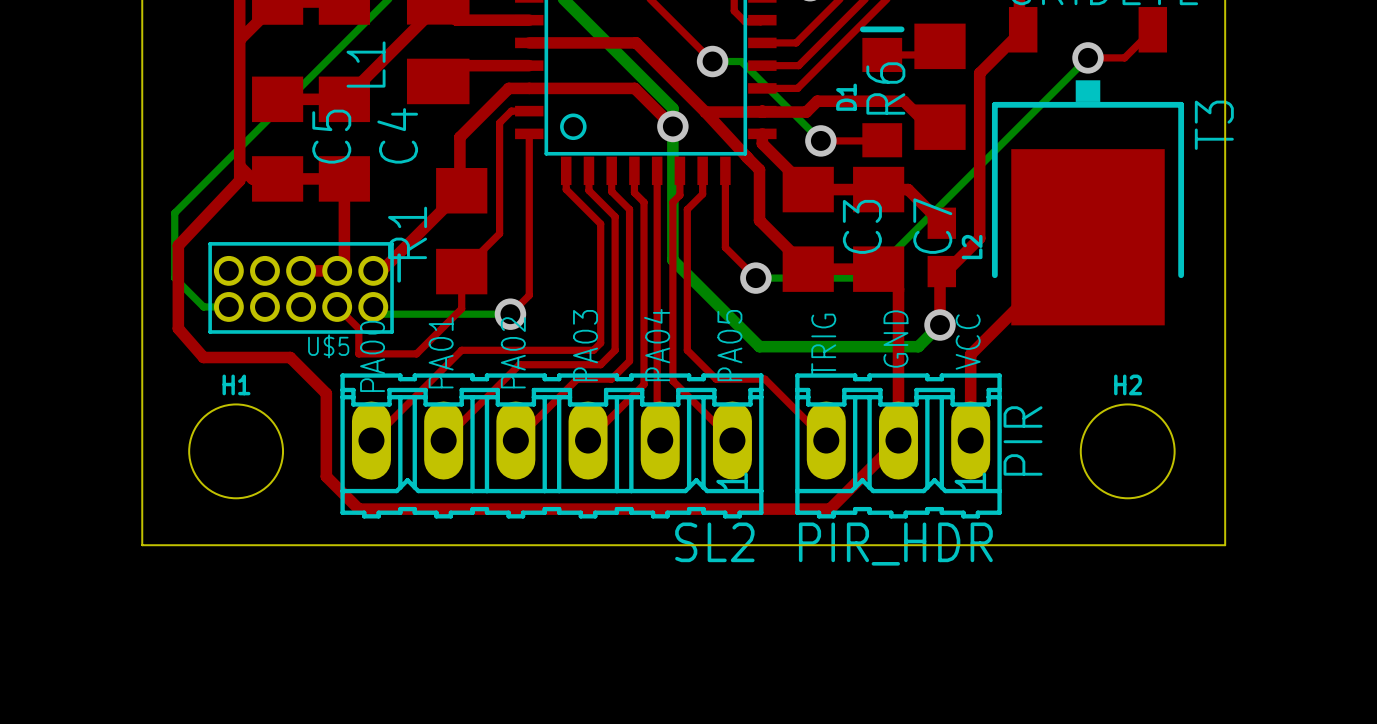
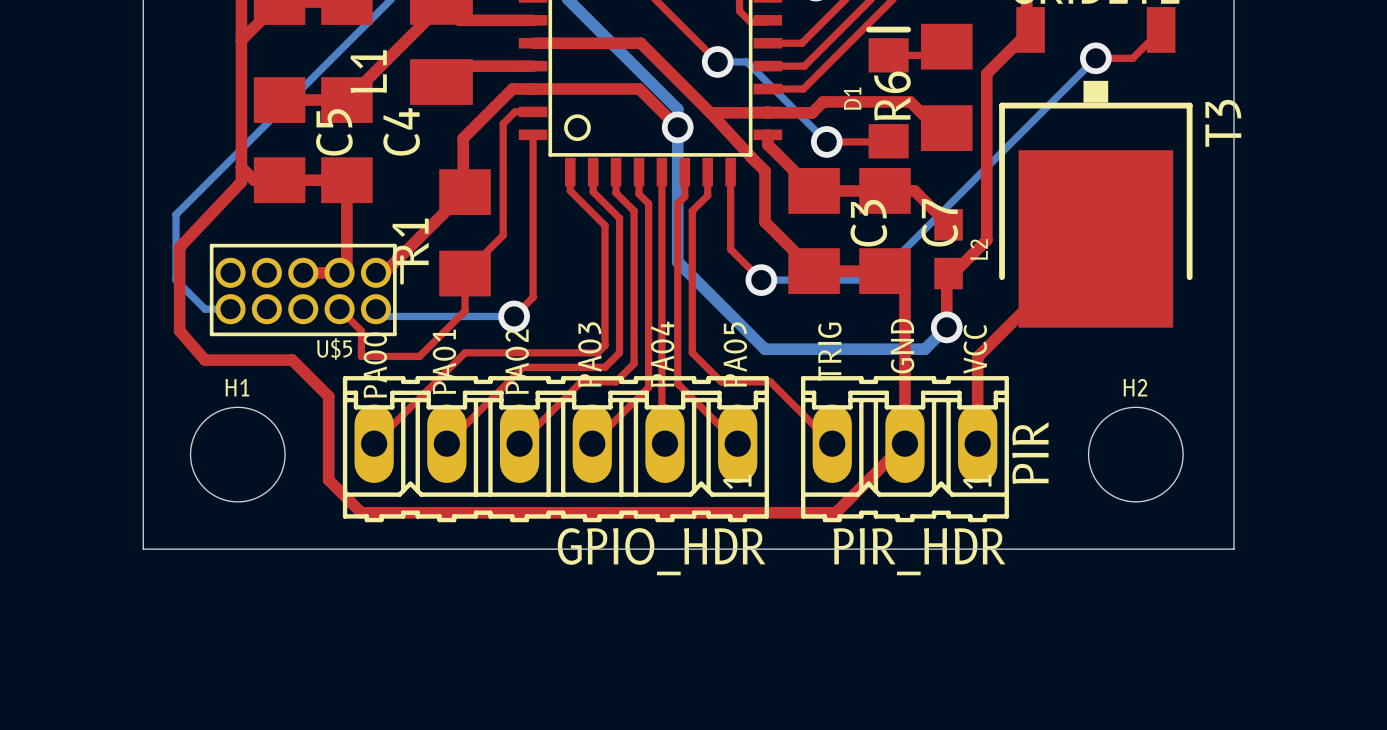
SL2 name: SL2 (714, 542) -> GPIO_HDR (661, 551)

